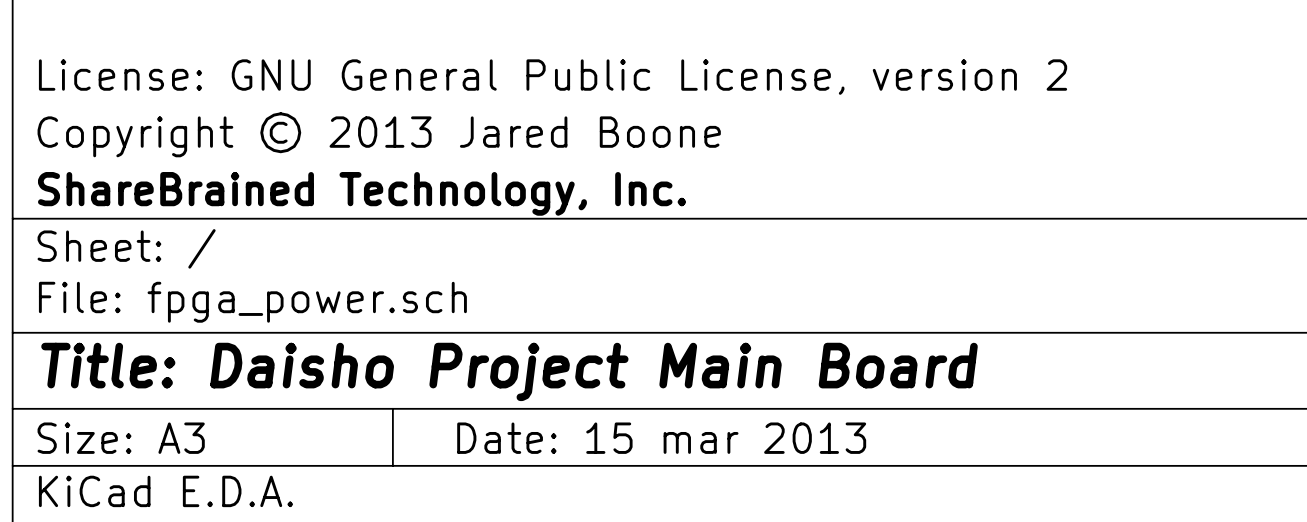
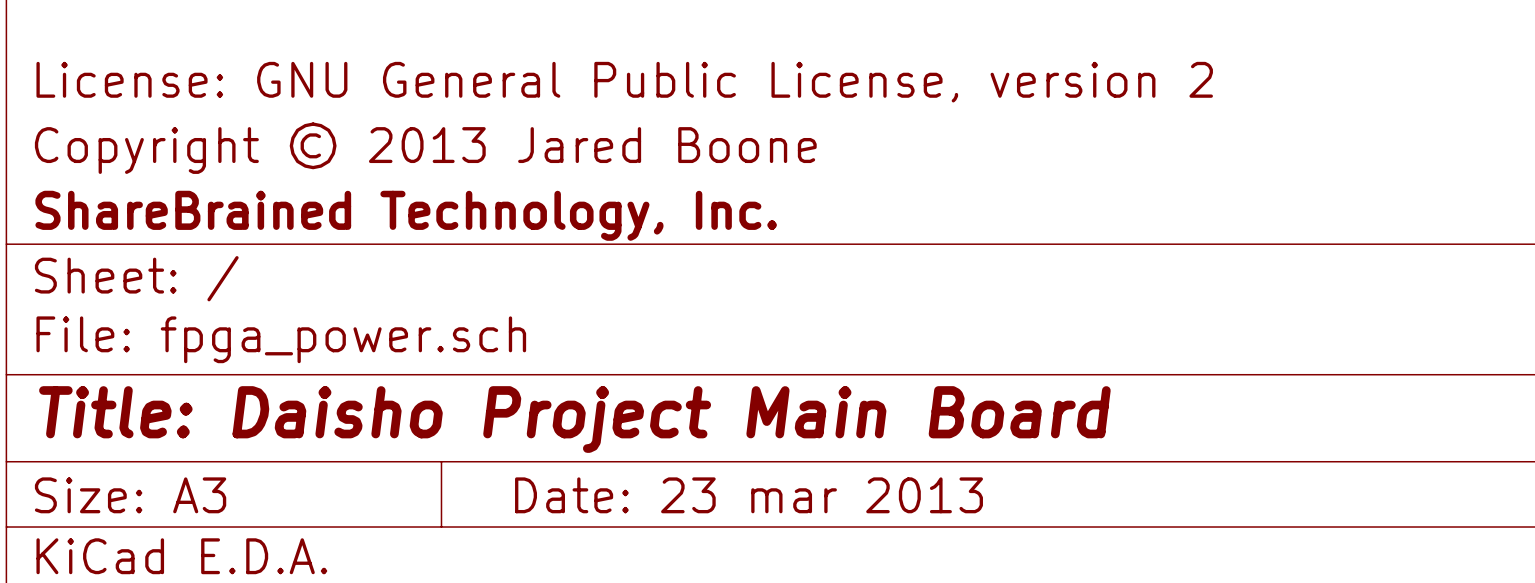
title block: Date: 15 mar 2013 (661, 438) -> Date: 23 mar 2013 (749, 495)

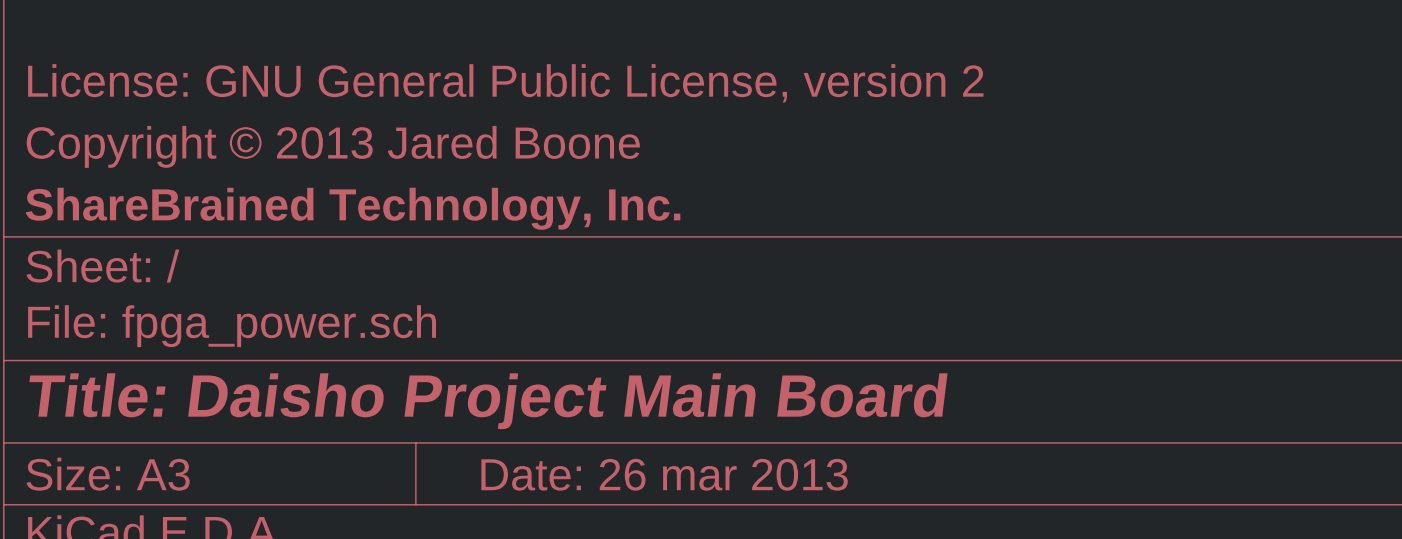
title block: Date: 23 mar 2013 (749, 495) -> Date: 26 mar 2013 (664, 474)

